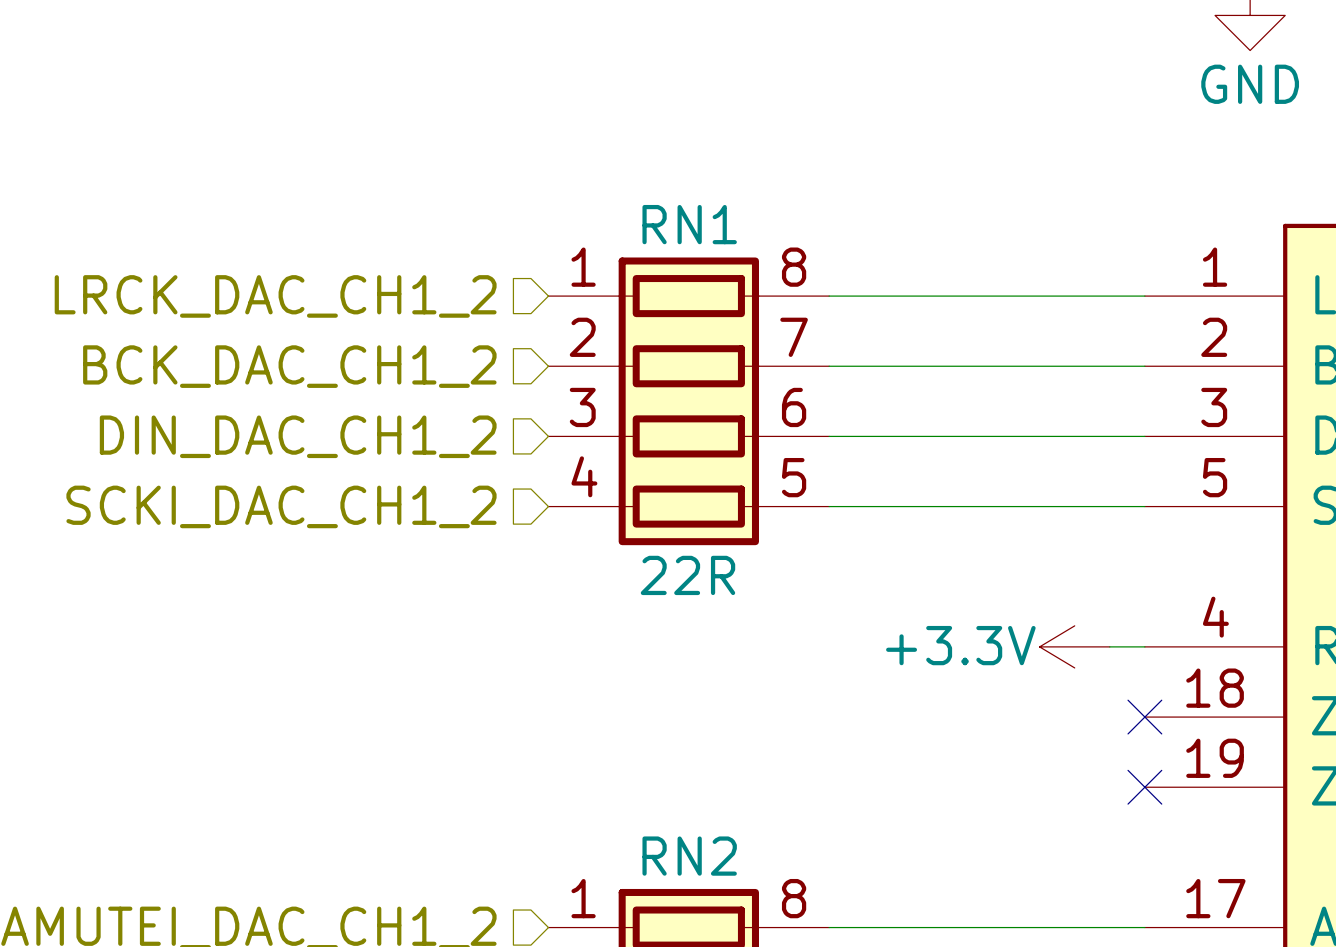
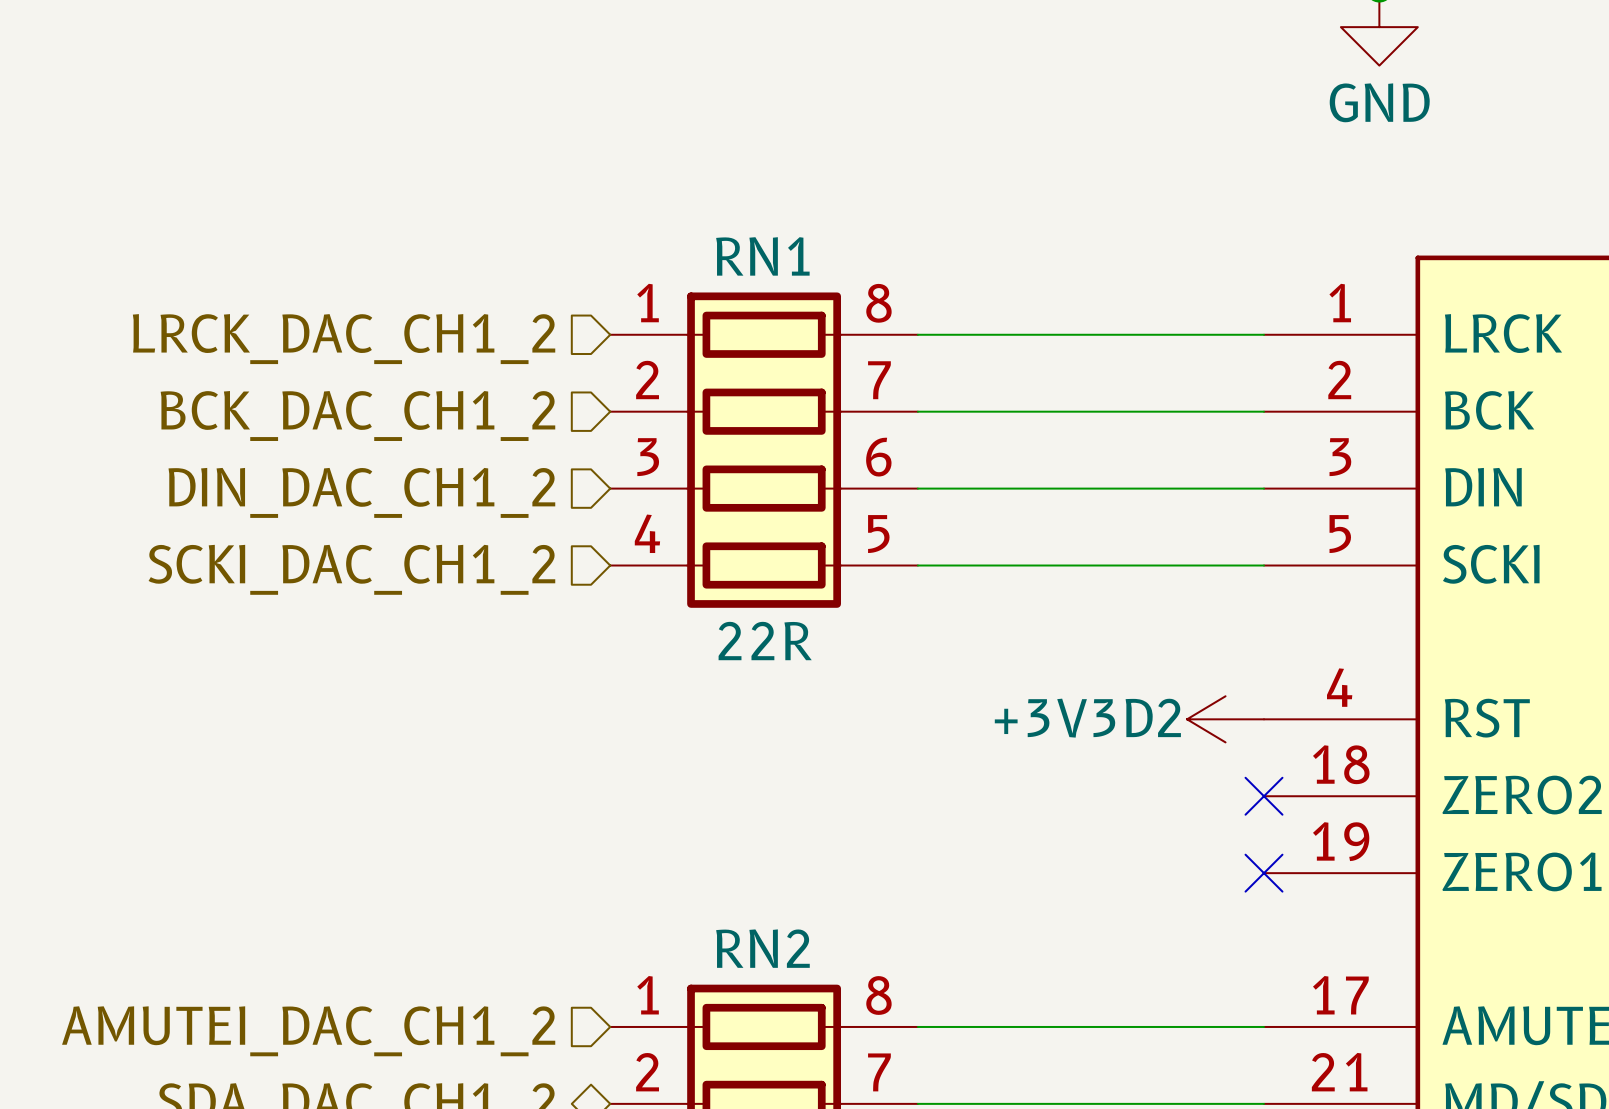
power symbol: +3.3V (1074, 646) -> none
power symbol: none -> +3V3D2 (1225, 719)

